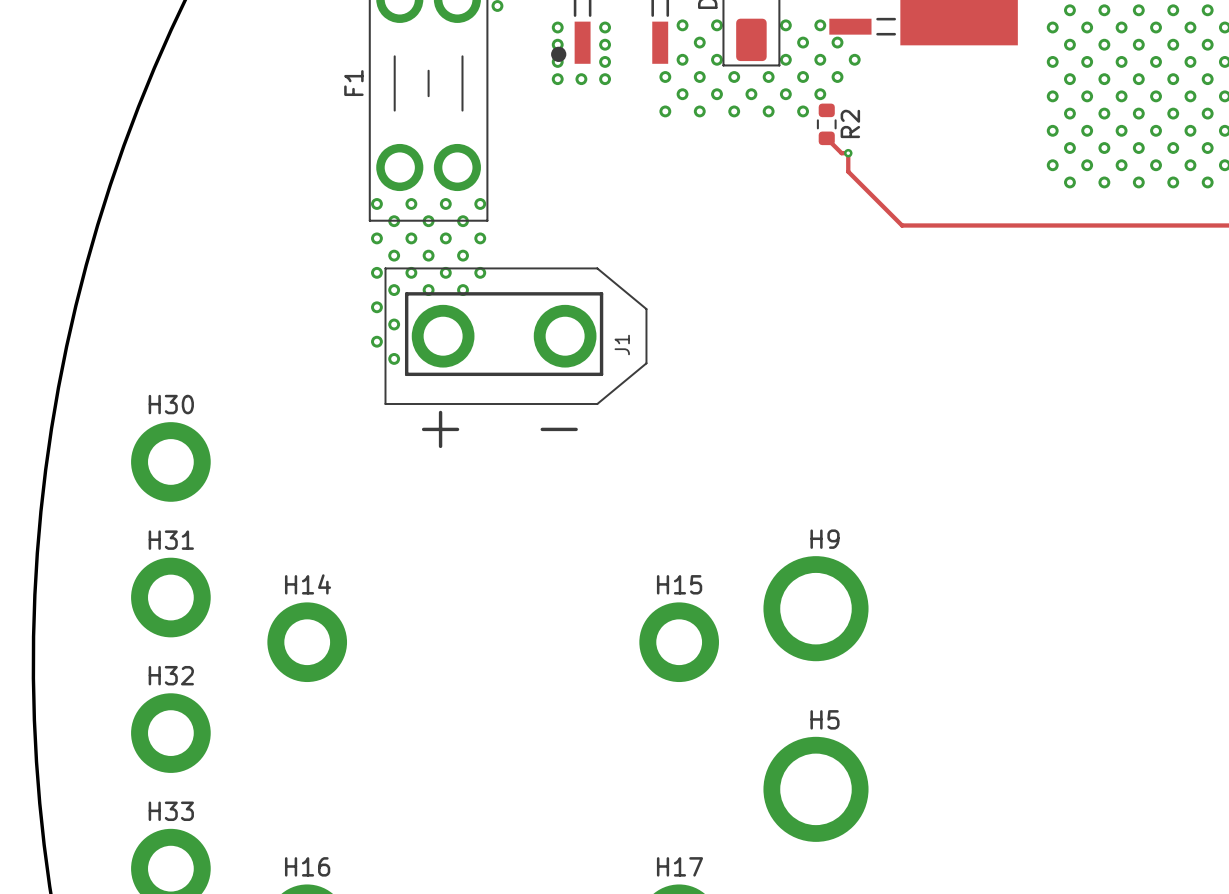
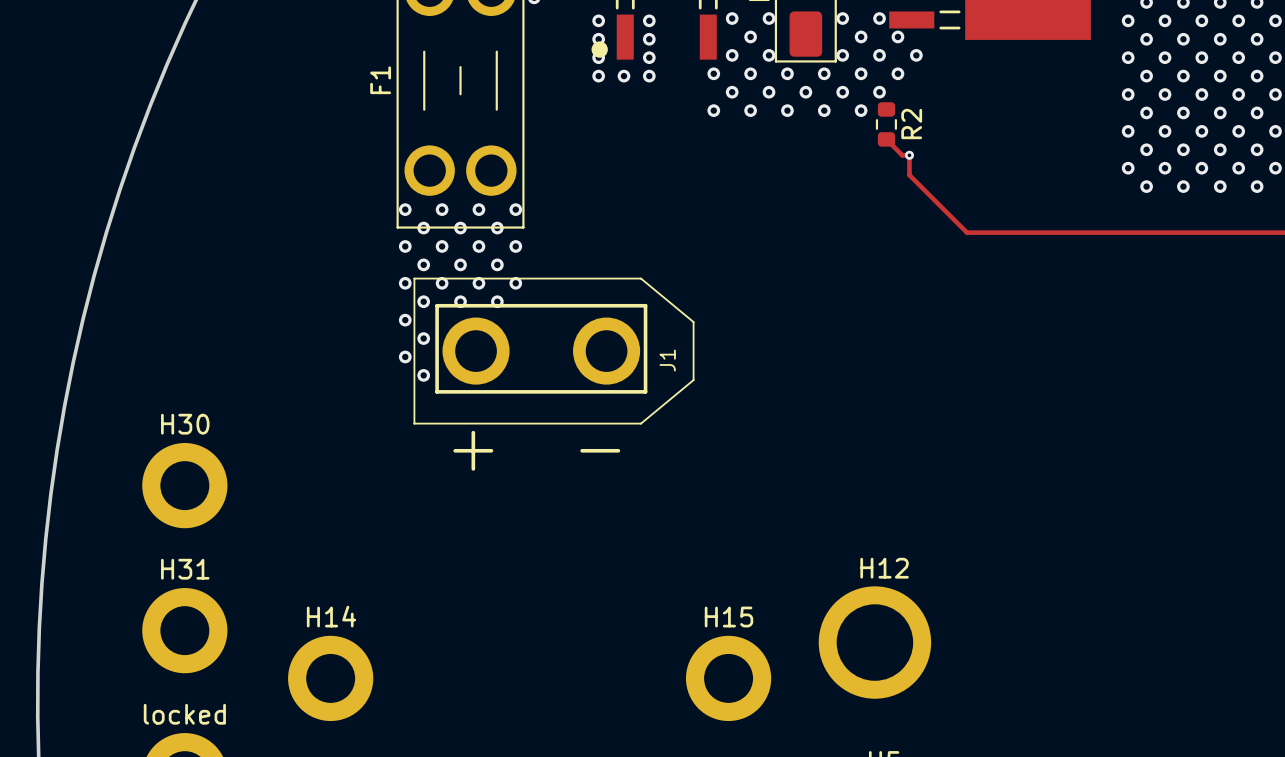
H9 name: H9 (824, 539) -> H12 (884, 568)
H32 name: H32 (171, 675) -> locked (184, 714)

